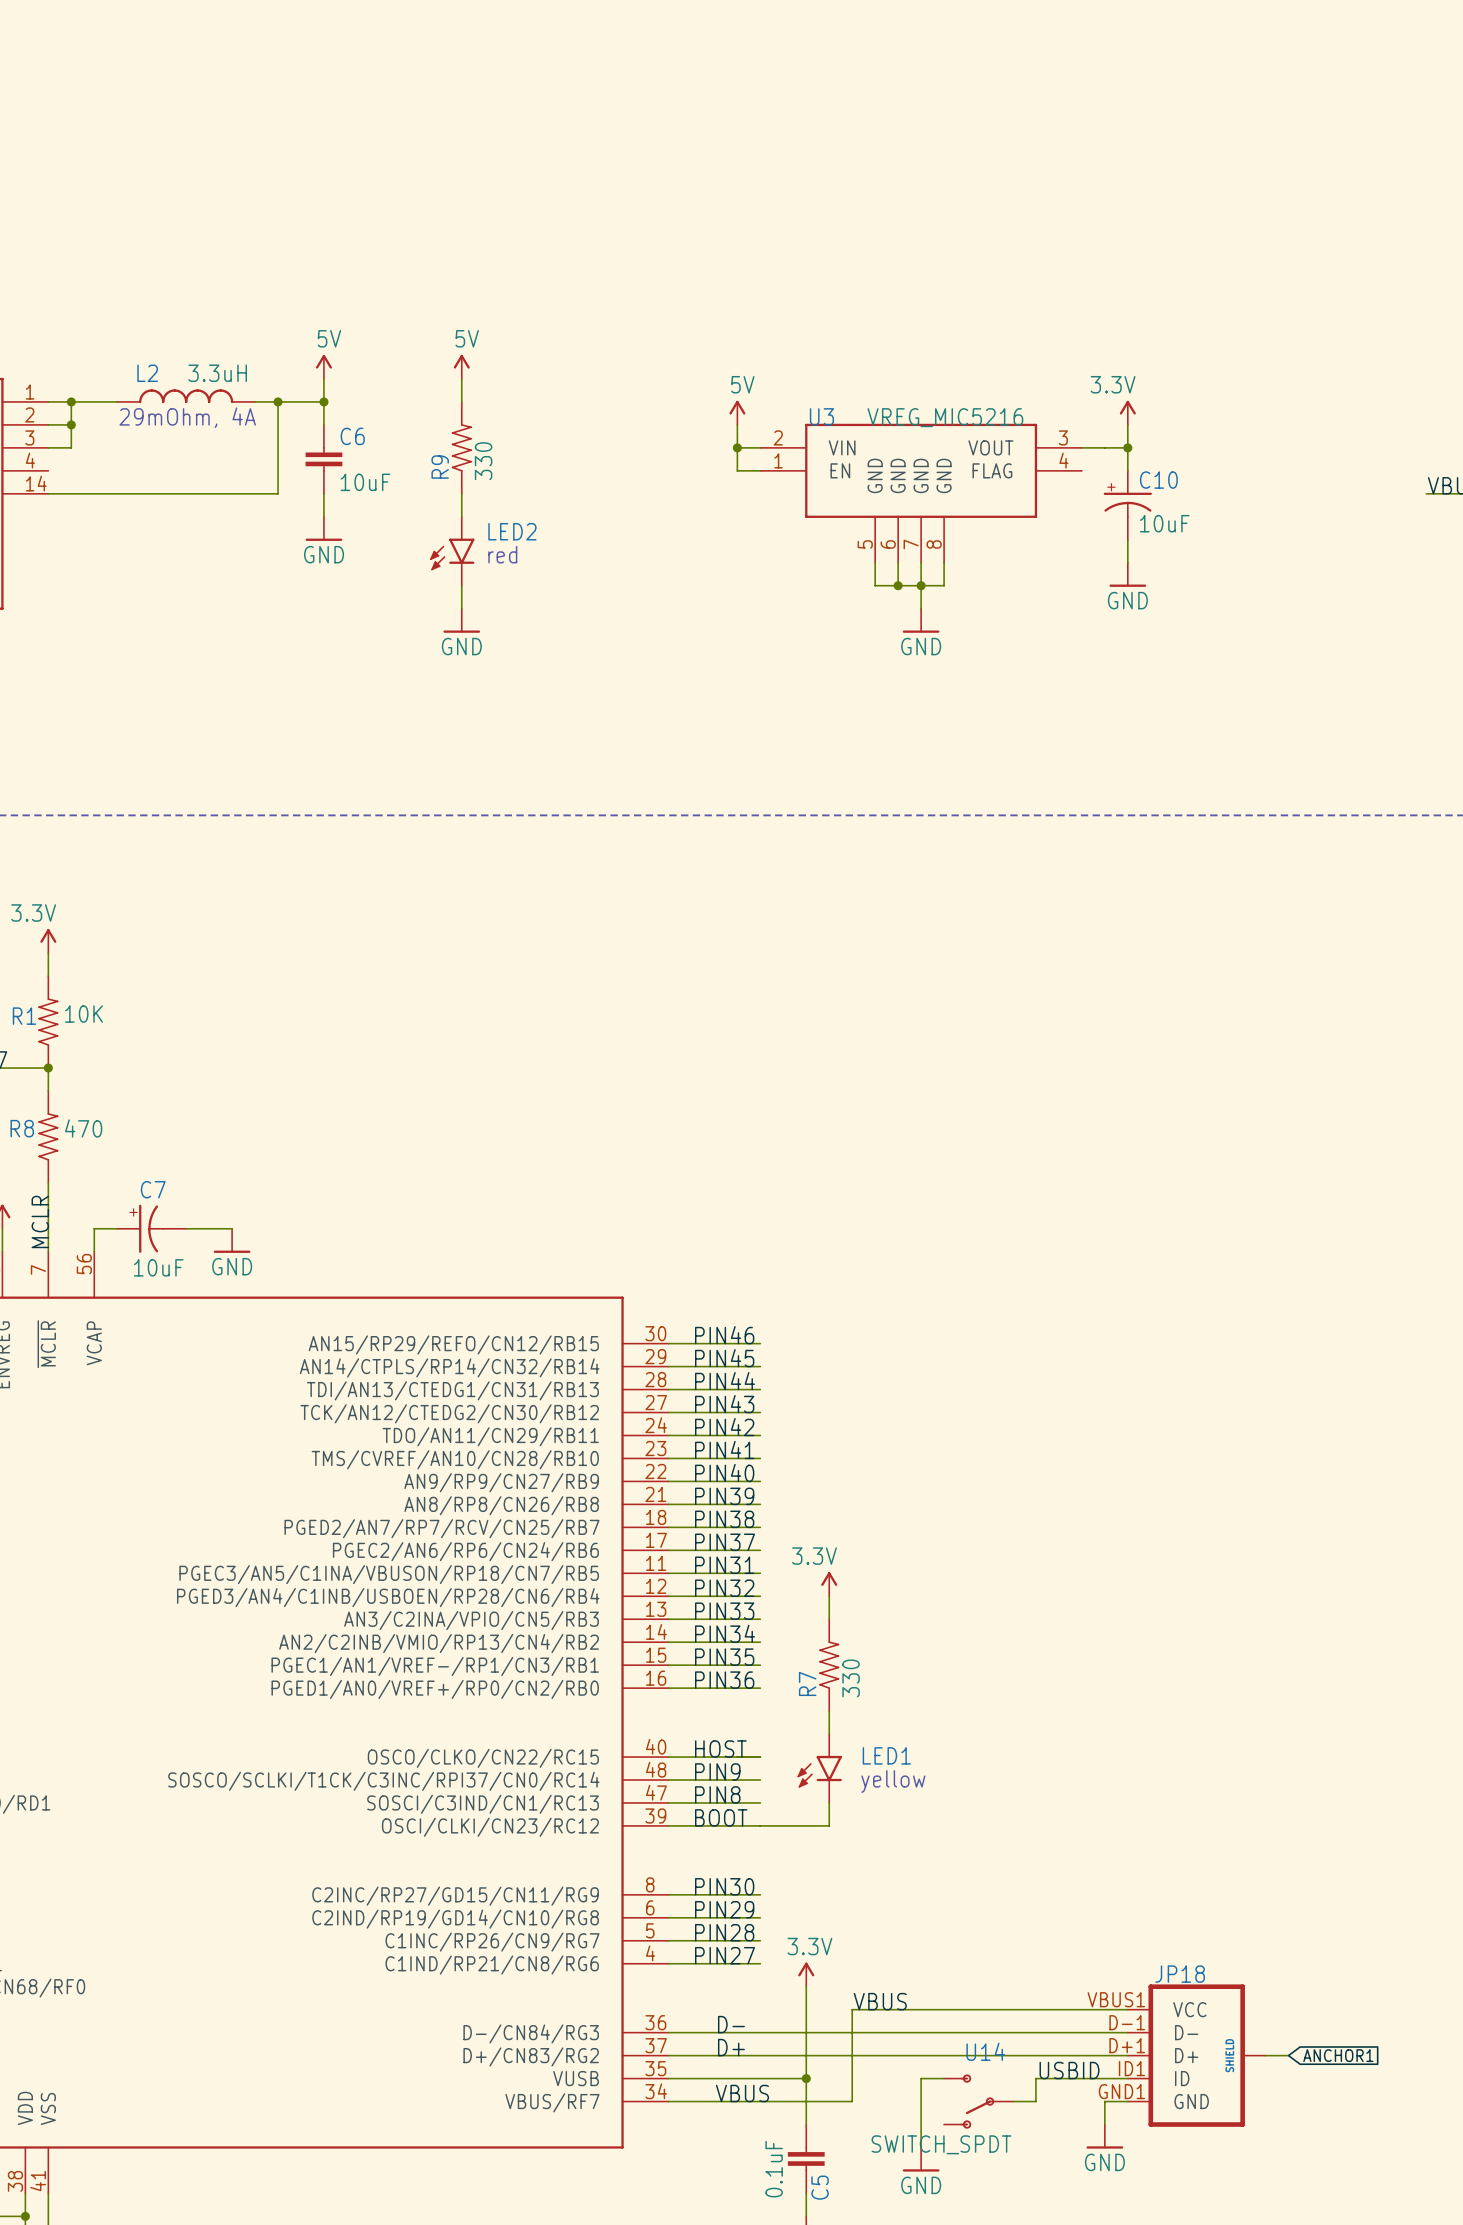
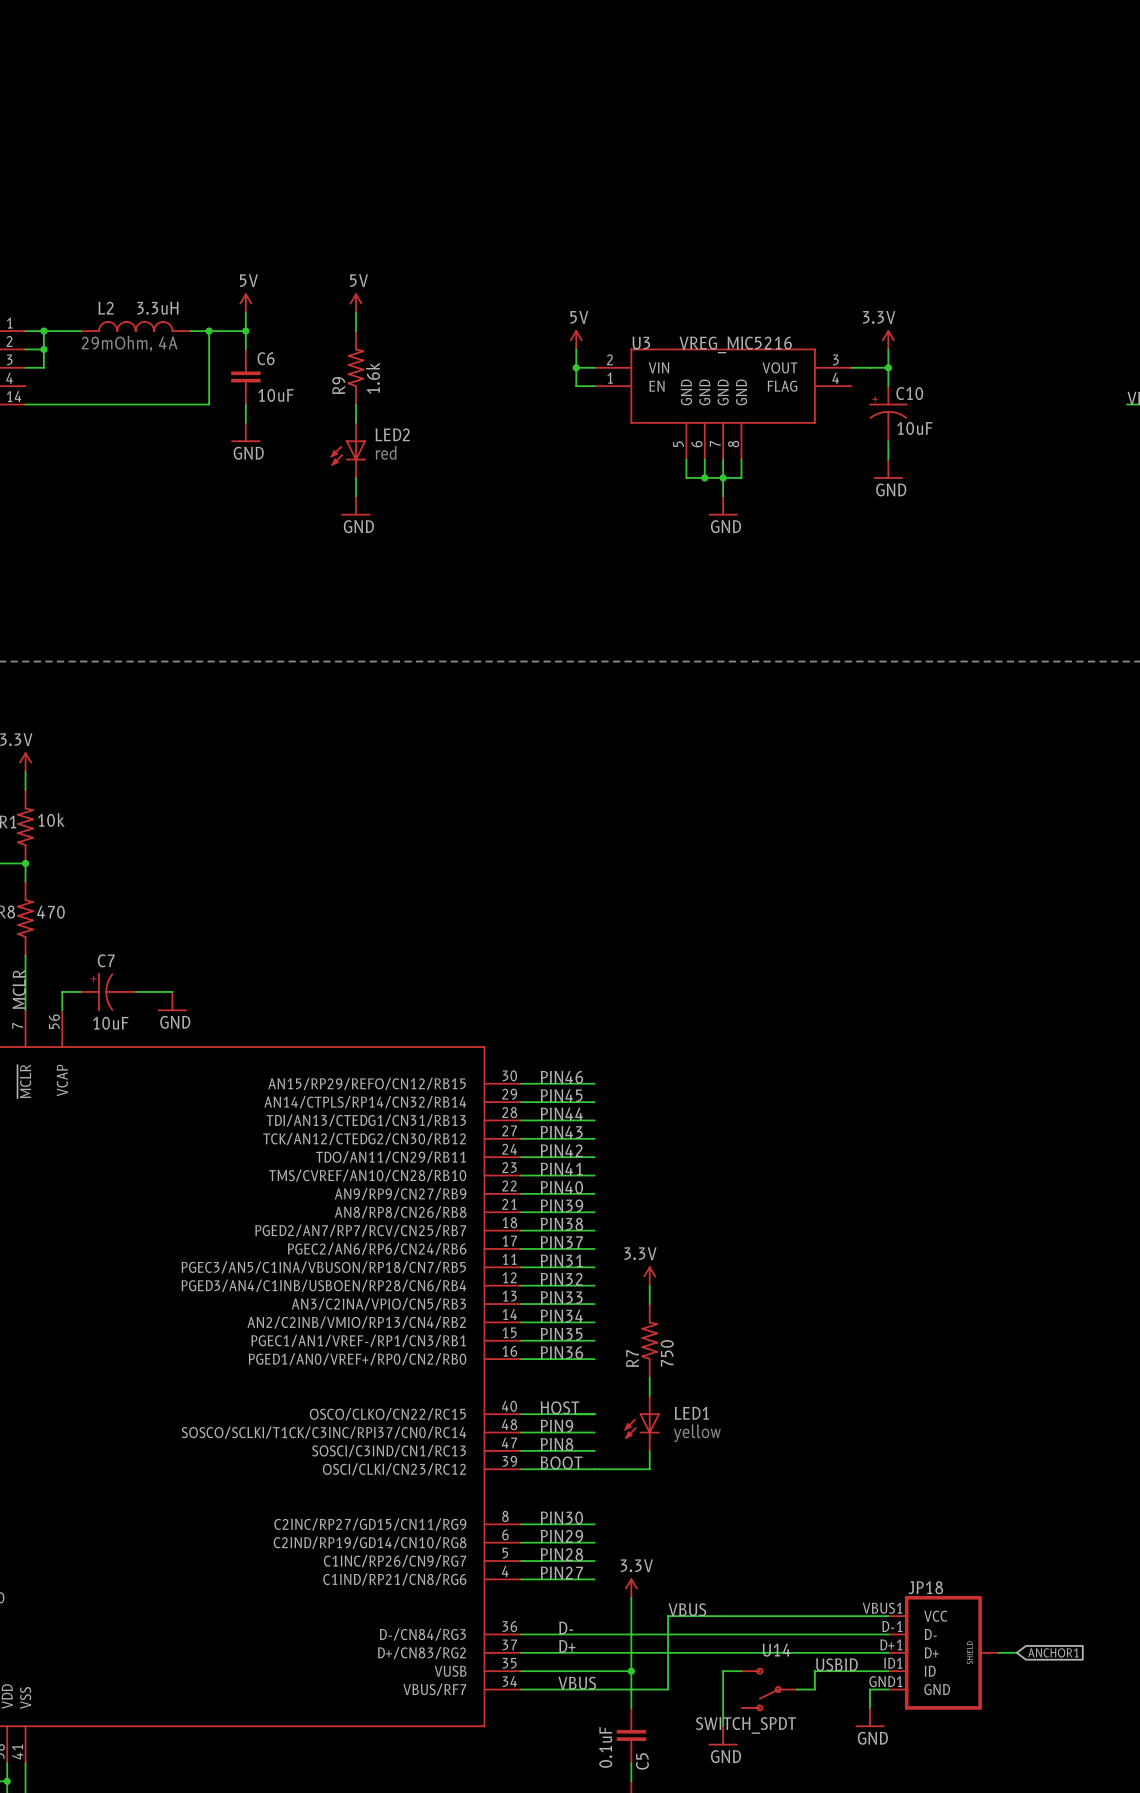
R9 value: 330 (483, 461) -> 1.6k (373, 378)
LED2 symbol: [430, 516, 475, 586] -> [330, 422, 367, 478]
R1 value: 10K (83, 1014) -> 10k (51, 819)
R7 value: 330 (851, 1678) -> 750 (667, 1353)
LED1 symbol: [797, 1734, 842, 1803] -> [624, 1395, 660, 1451]

